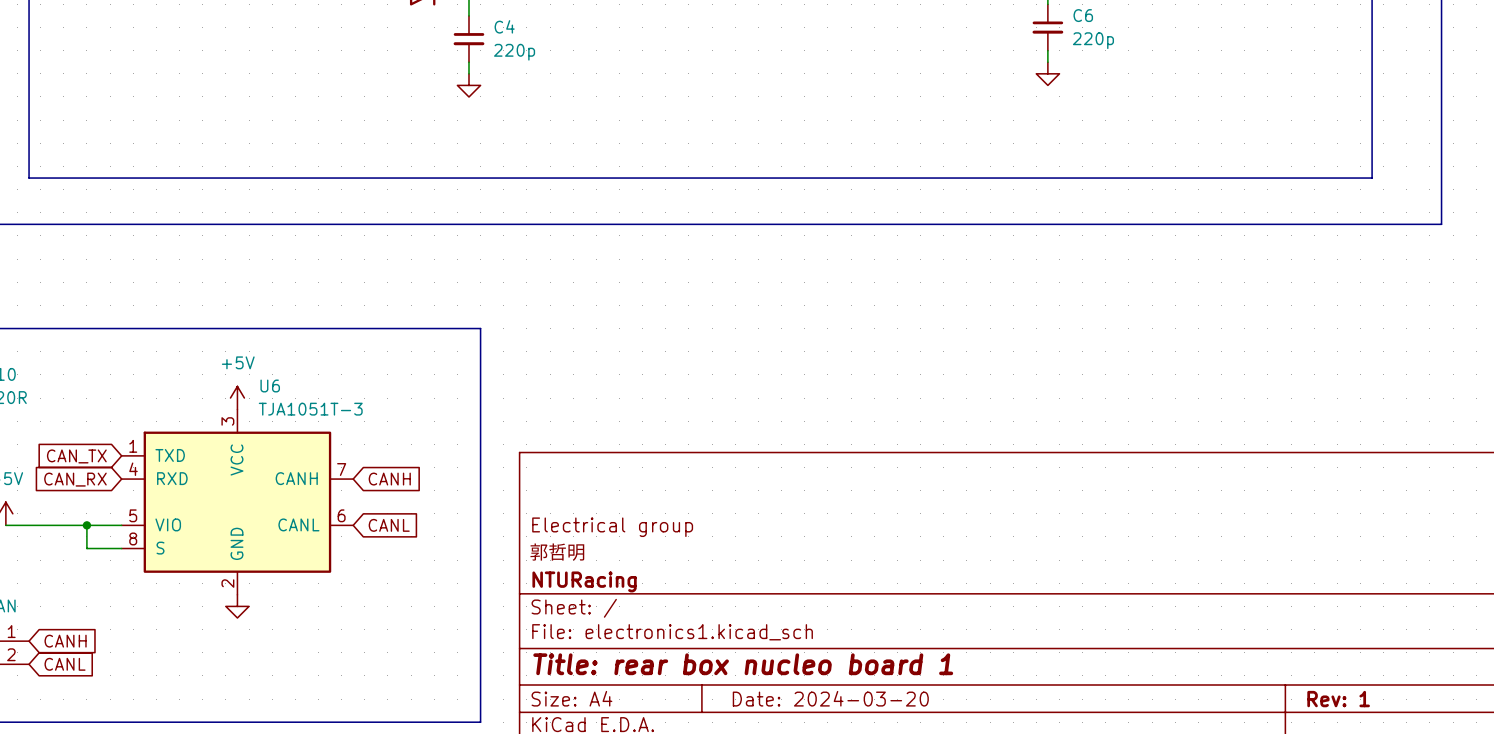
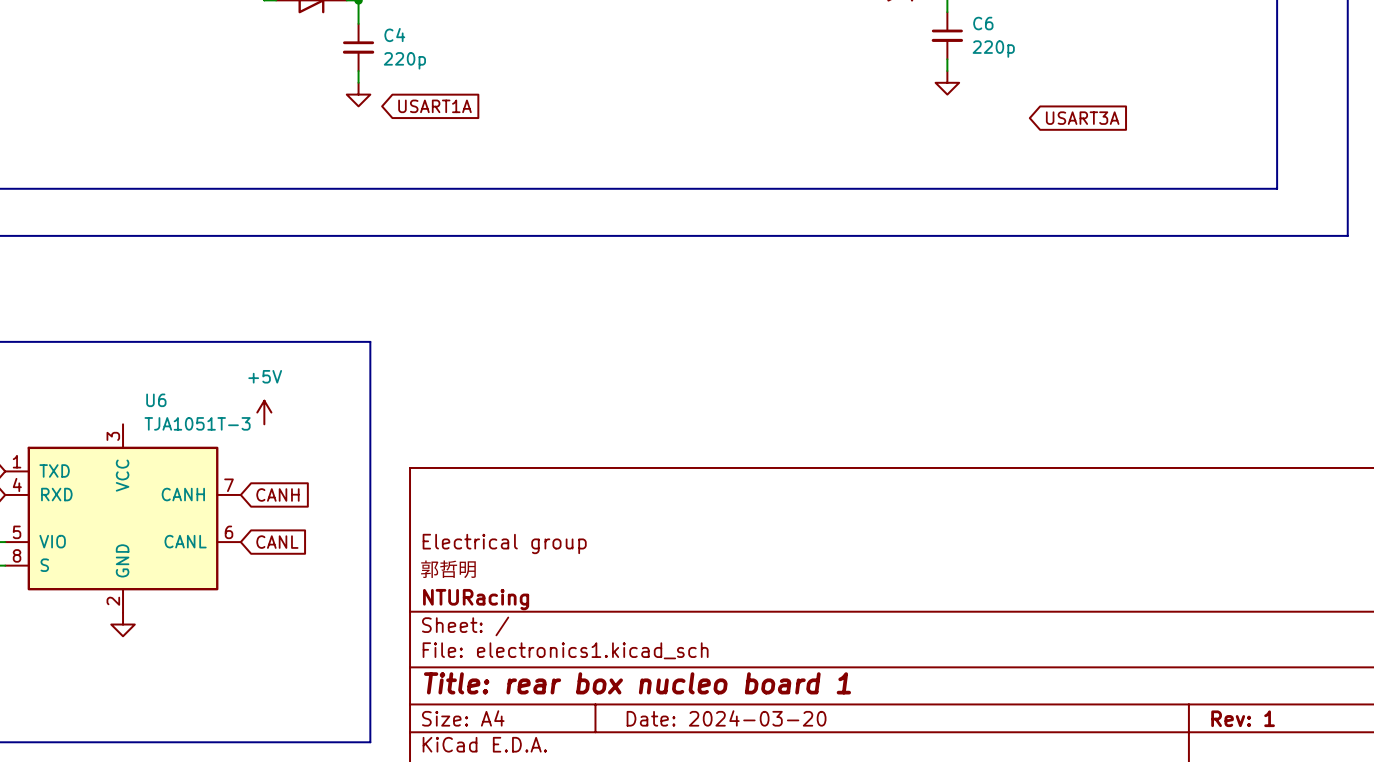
global label: none -> USART1A (434, 106)
global label: none -> USART3A (1082, 118)
power symbol position: +5V (237, 398) -> +5V (264, 412)

